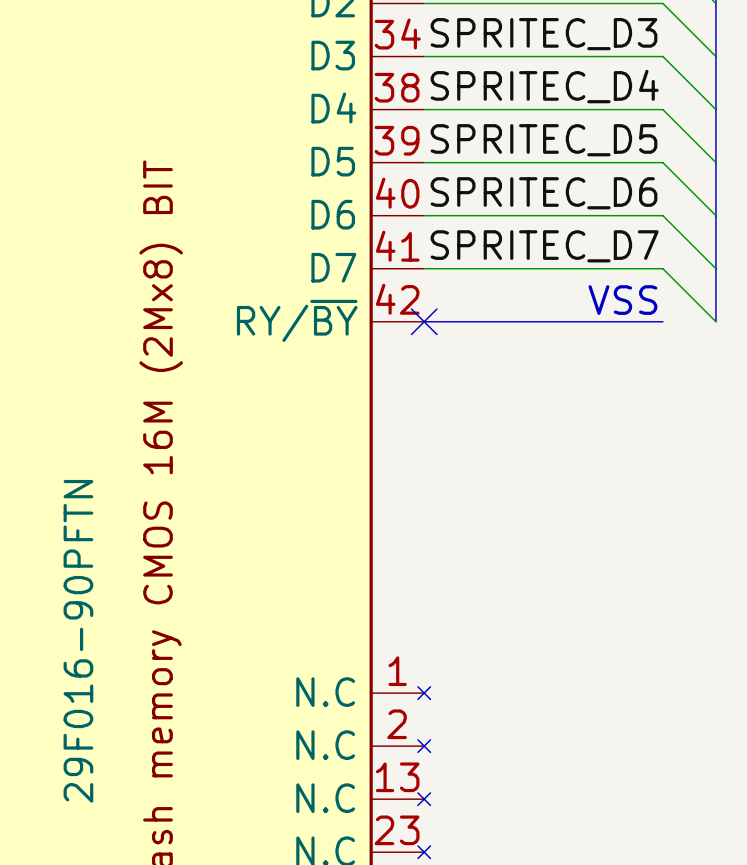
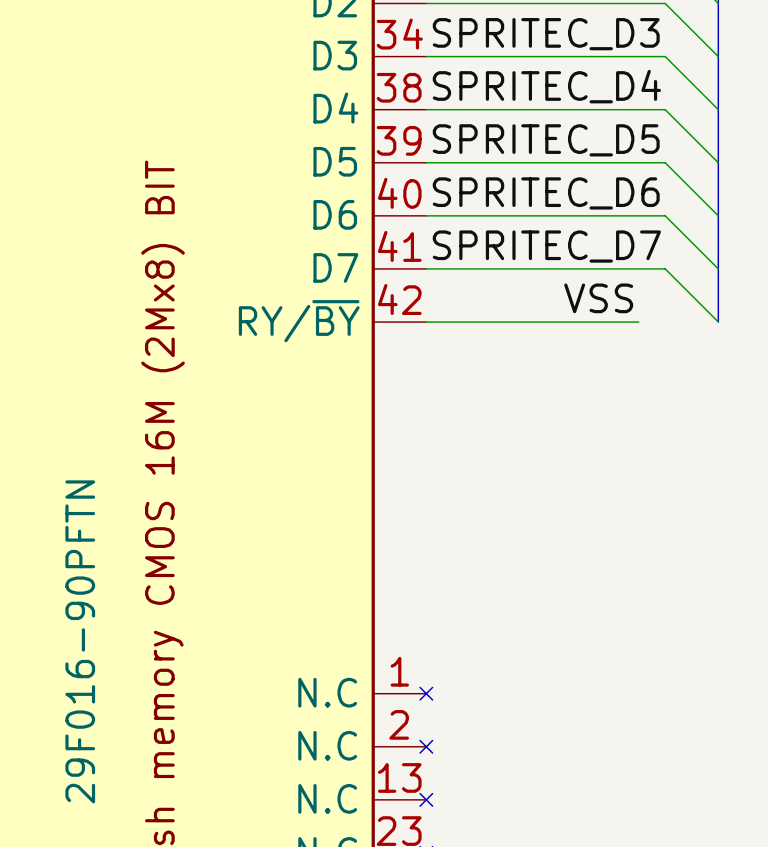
label: none -> VSS (598, 298)
text: VSS (622, 300) -> none
line: (424, 321) (662, 321) -> none
no-connect mark: (424, 321) -> none

